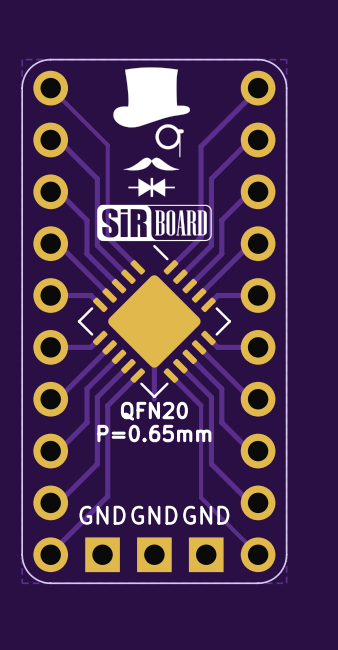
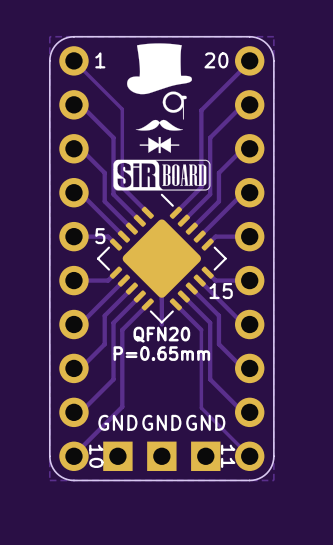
text: none -> 1 (100, 60)
text: none -> 20 (216, 60)
text: none -> 5 (100, 236)
text: none -> 15 (221, 291)
text: none -> 10 (96, 456)
text: none -> 11 (228, 456)

